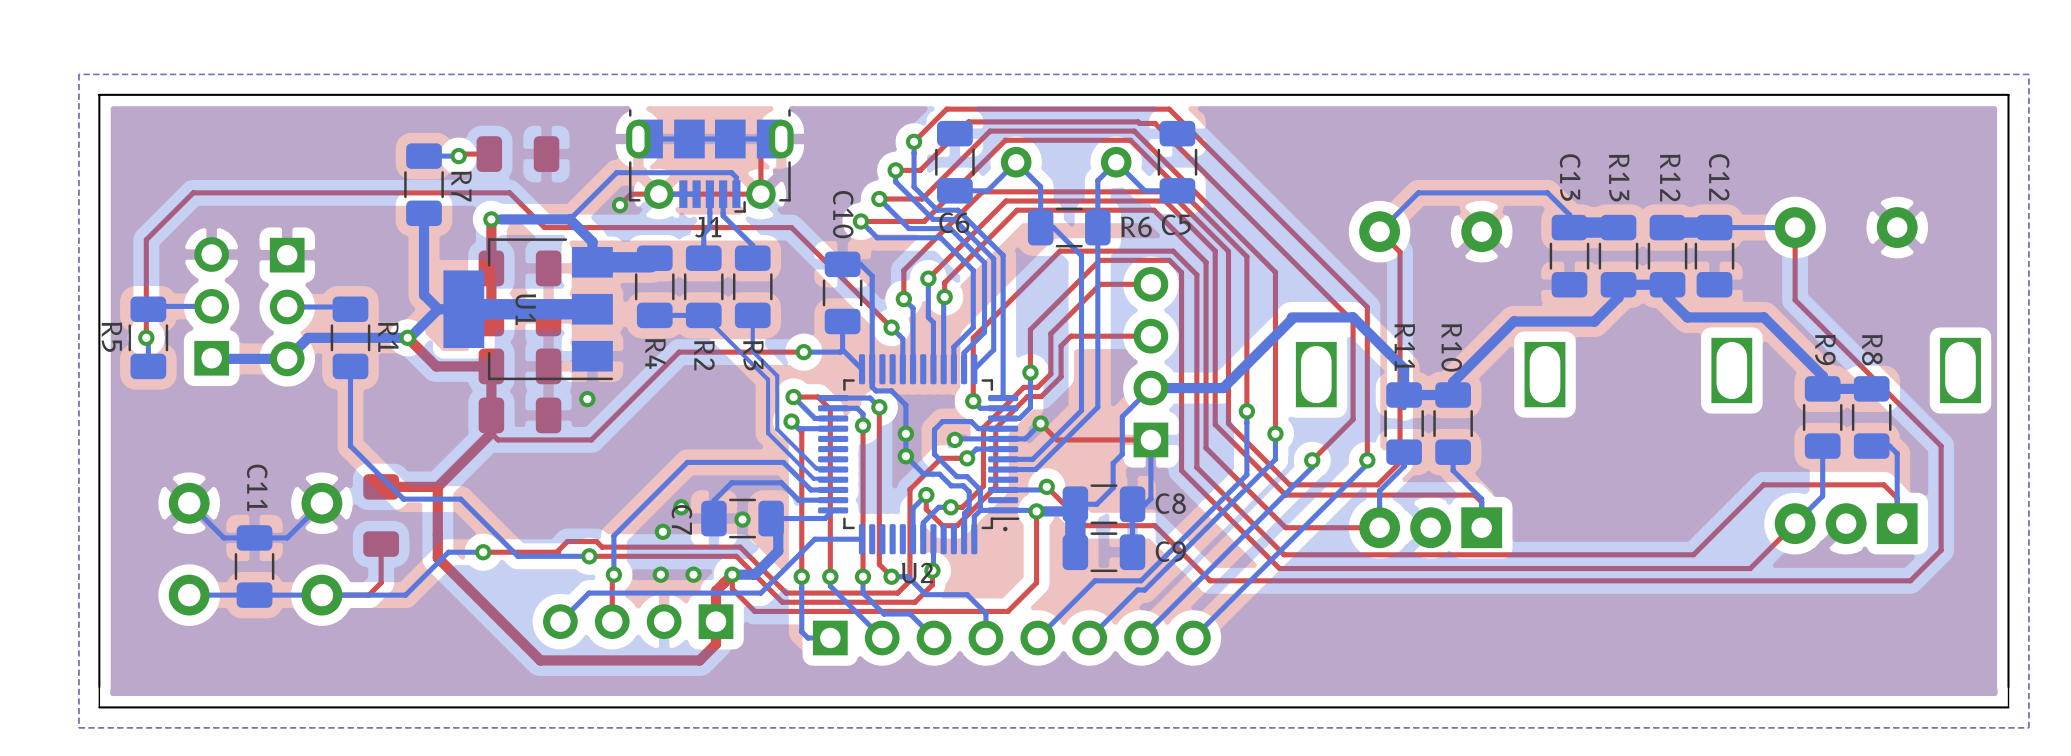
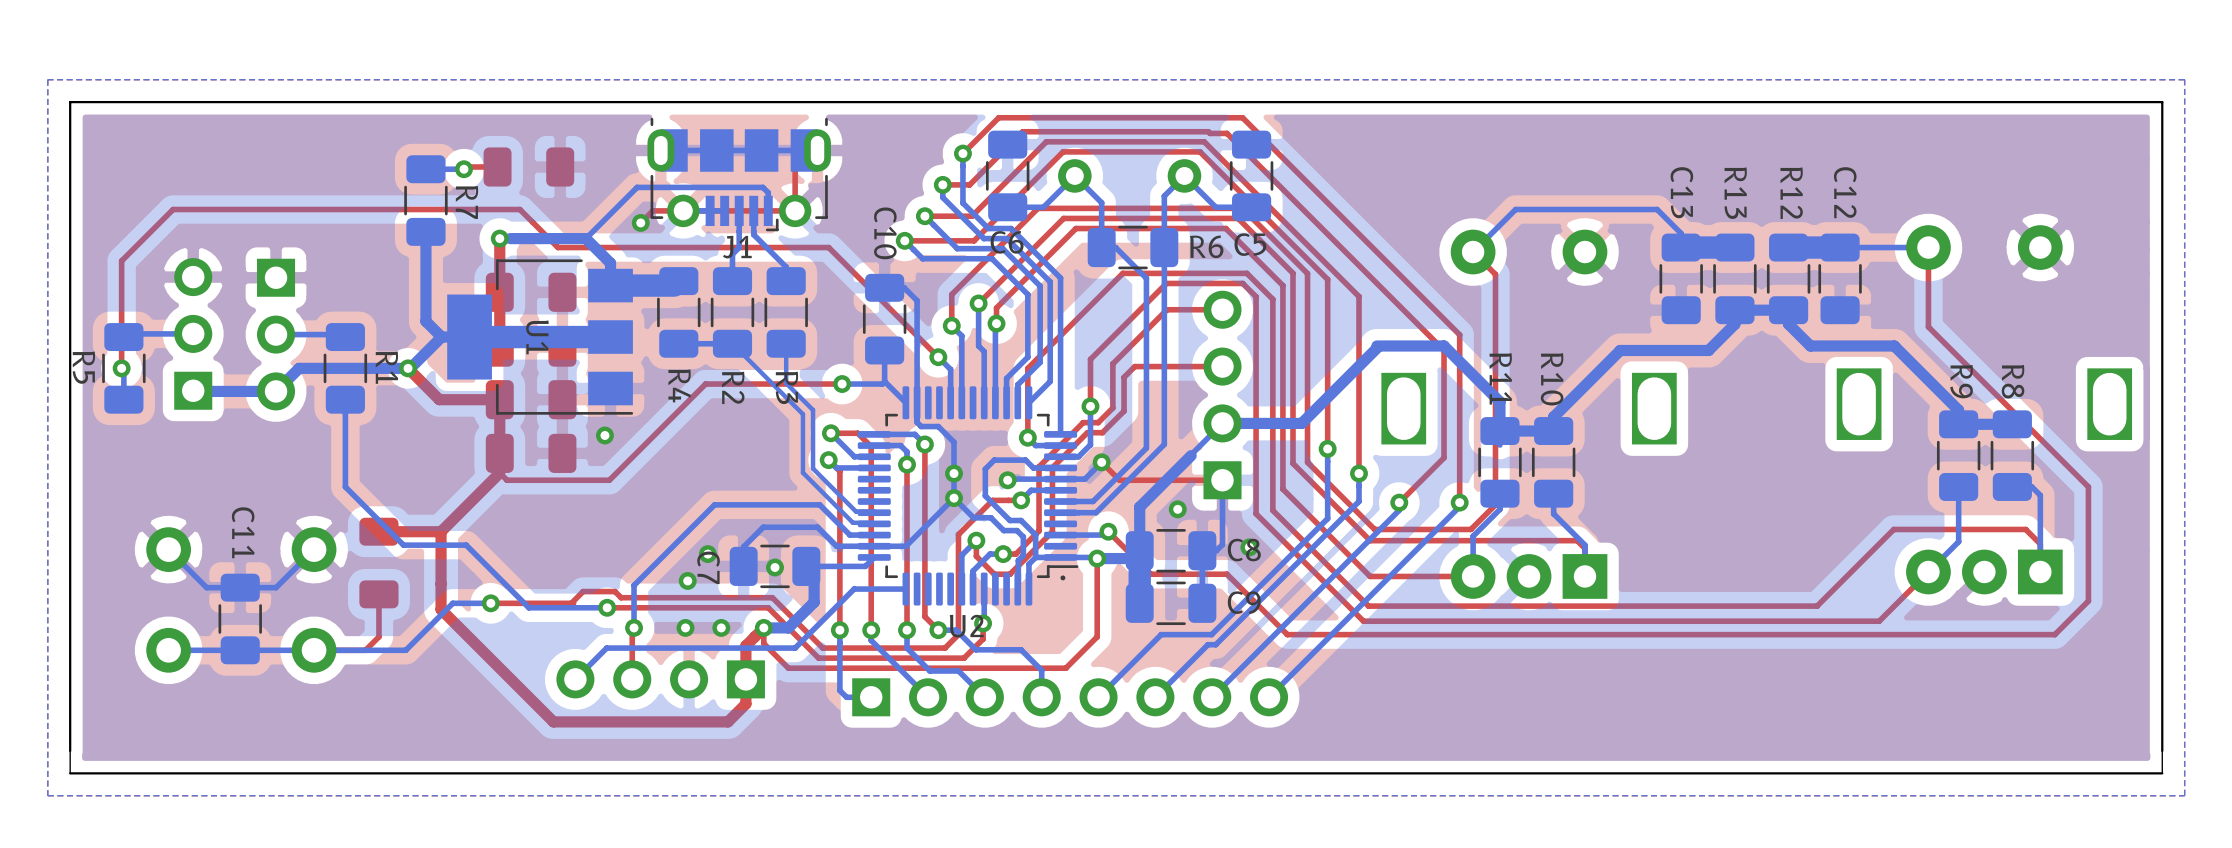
bottom track: (1122, 417) (1122, 454) (1113, 463) (1113, 487) (1096, 504) (1075, 504) -> (1191, 455) (1139, 507) (1139, 550)
bottom track: none -> (954, 498) (905, 546) (874, 546)
via: none -> (1177, 509)
via: none -> (1249, 547)

